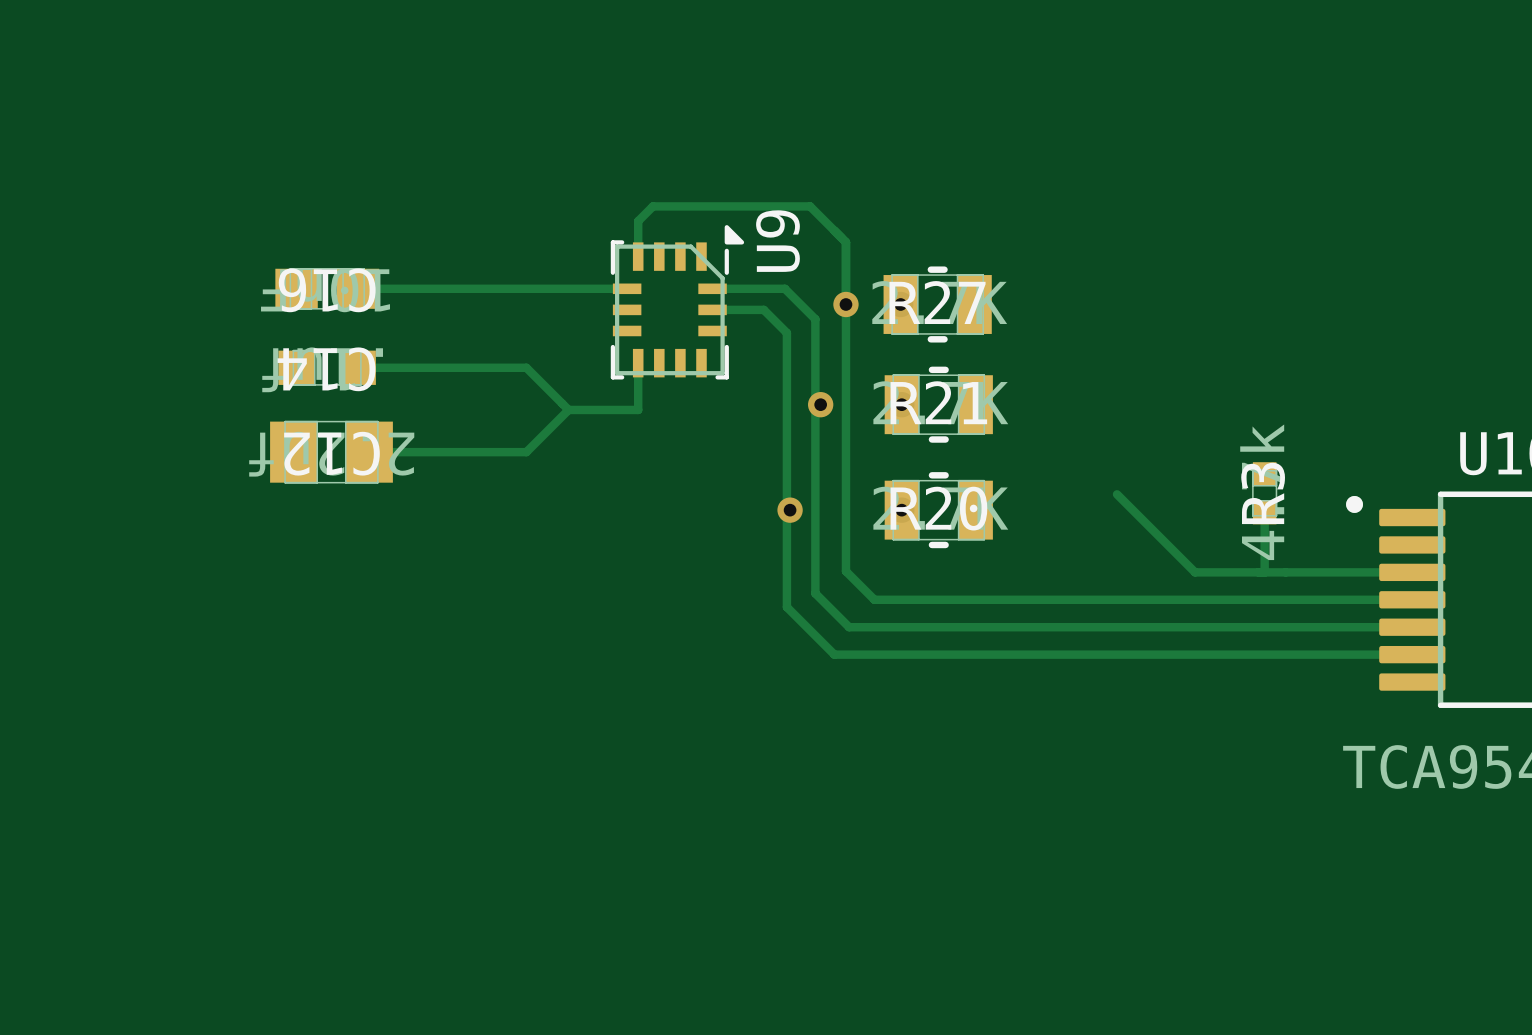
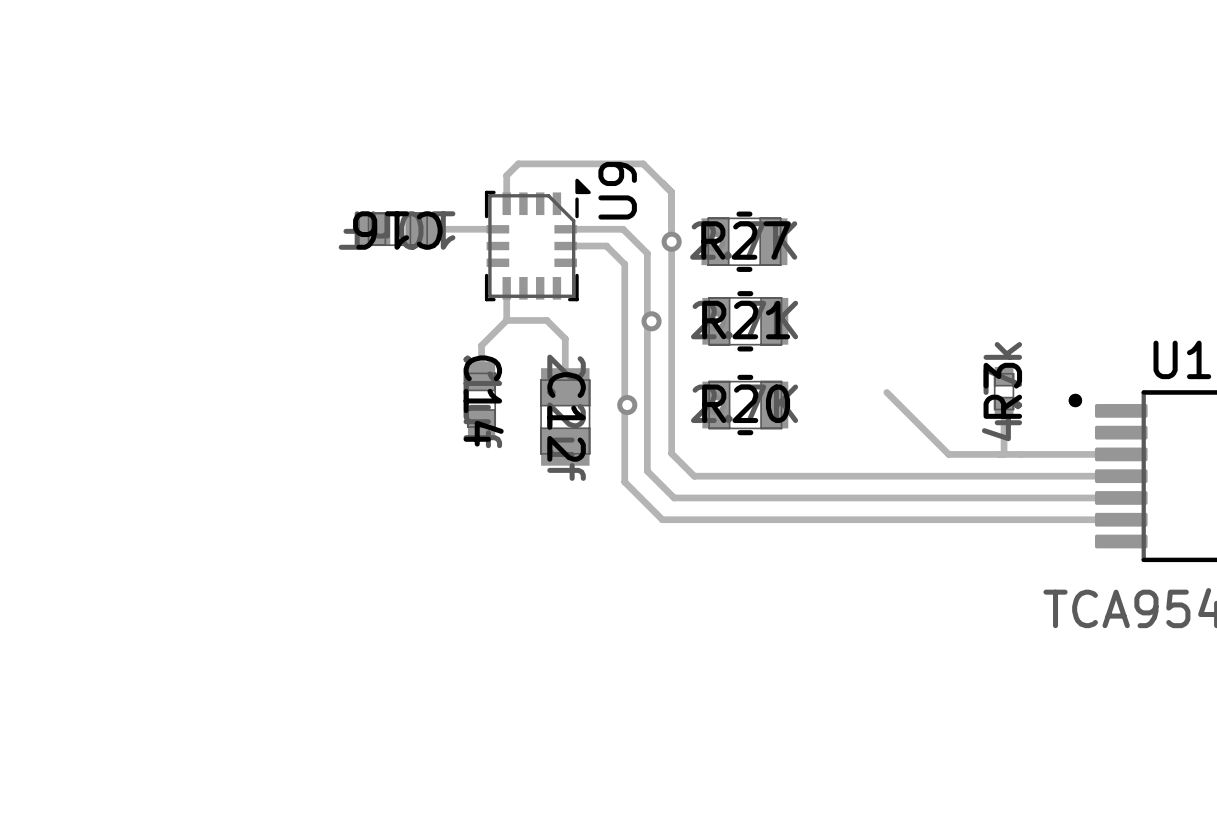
C16 position: (327, 288) -> (397, 229)
track: (357, 288) (531, 288) -> none
C14 rotation: 0° (327, 367) -> 90° clockwise (481, 400)
C14 position: (327, 367) -> (481, 400)
track: (357, 367) (526, 367) (568, 409) -> none
track: (638, 403) (638, 409) (568, 409) -> none
track: (568, 409) (526, 452) (369, 452) -> none
C12 rotation: 0° (331, 452) -> 90° counterclockwise (565, 416)
C12 position: (331, 452) -> (565, 416)
track: none -> (481, 375) (481, 345) (506, 320) (546, 320) (565, 338) (565, 386)

